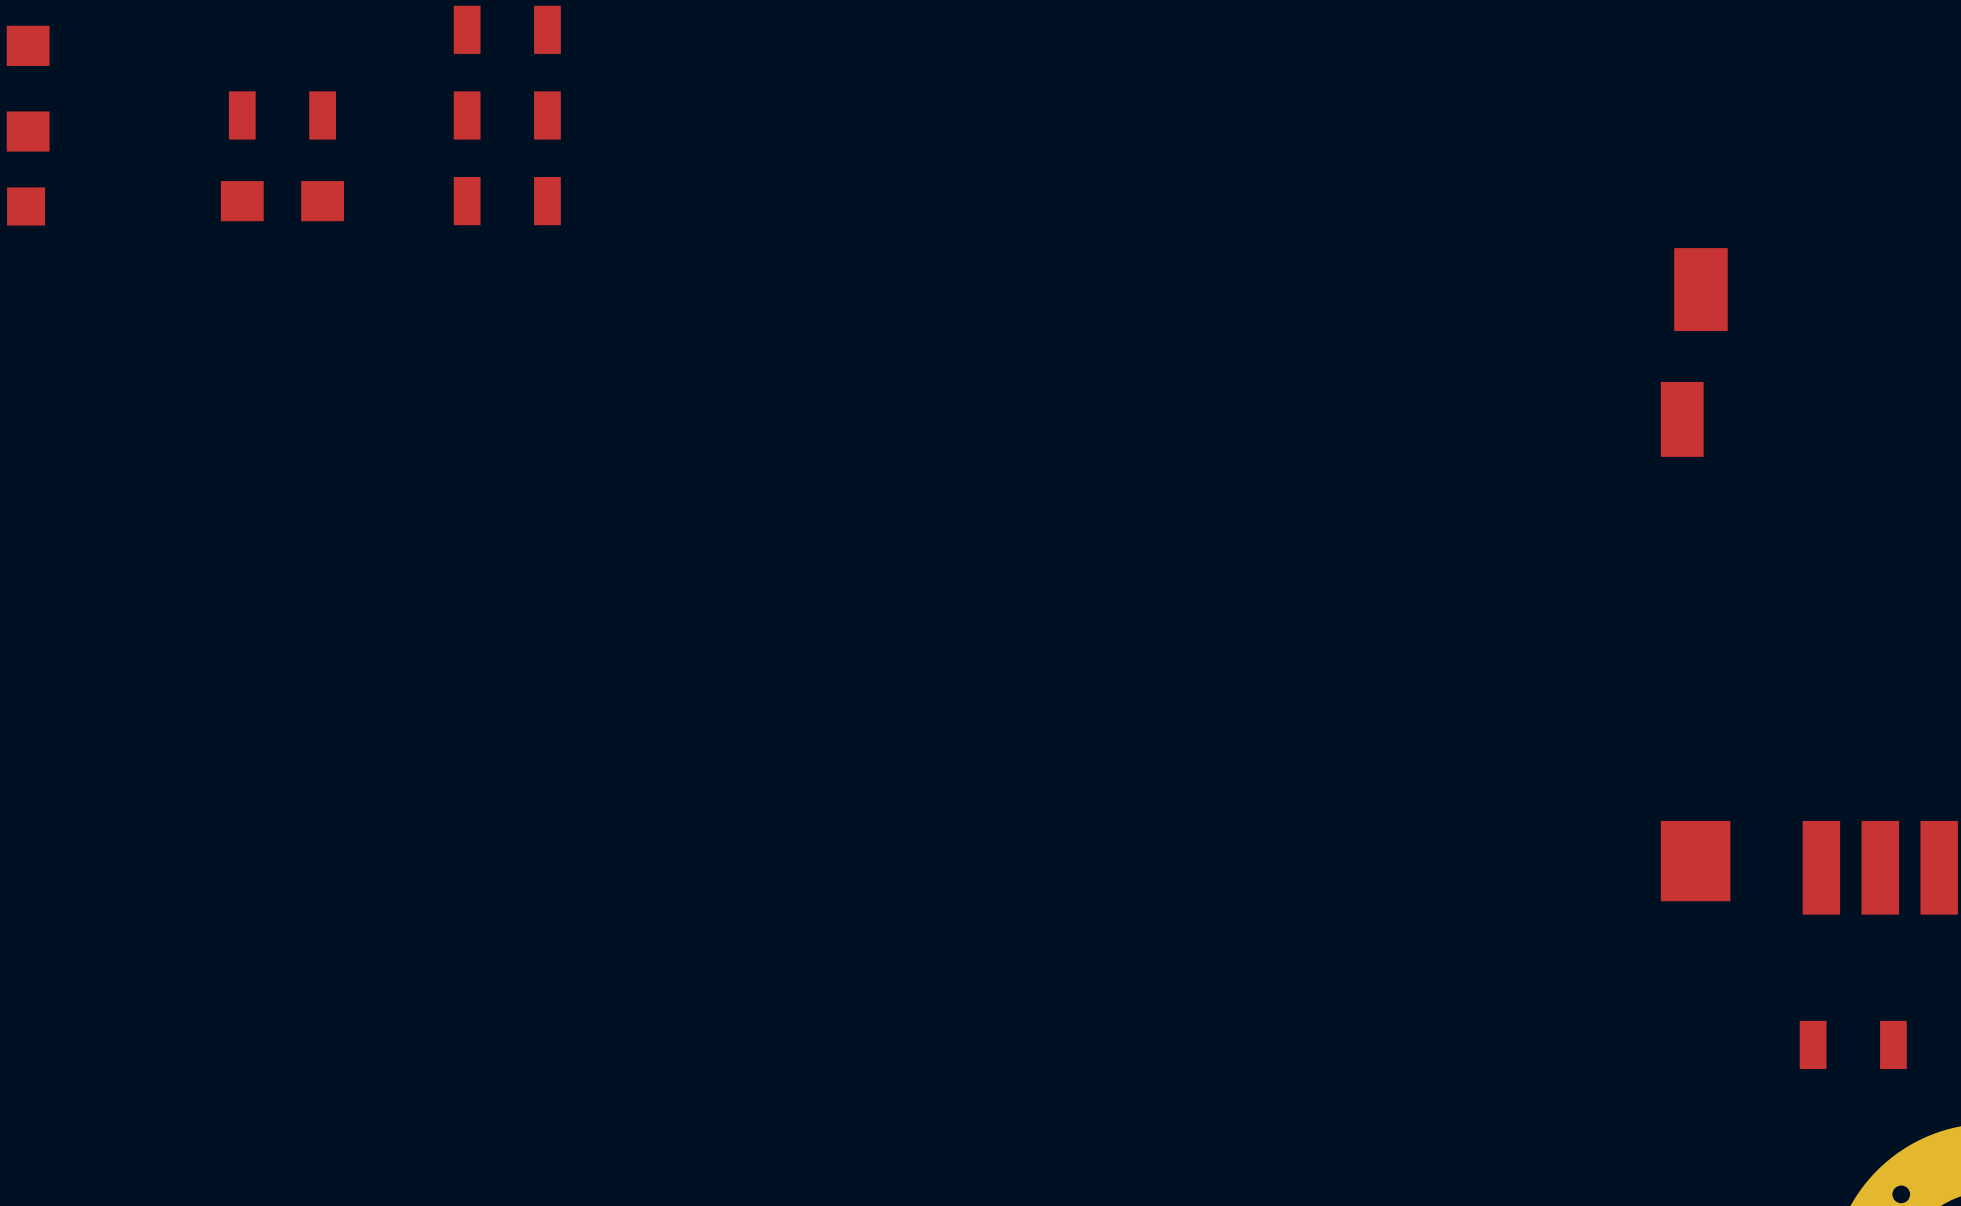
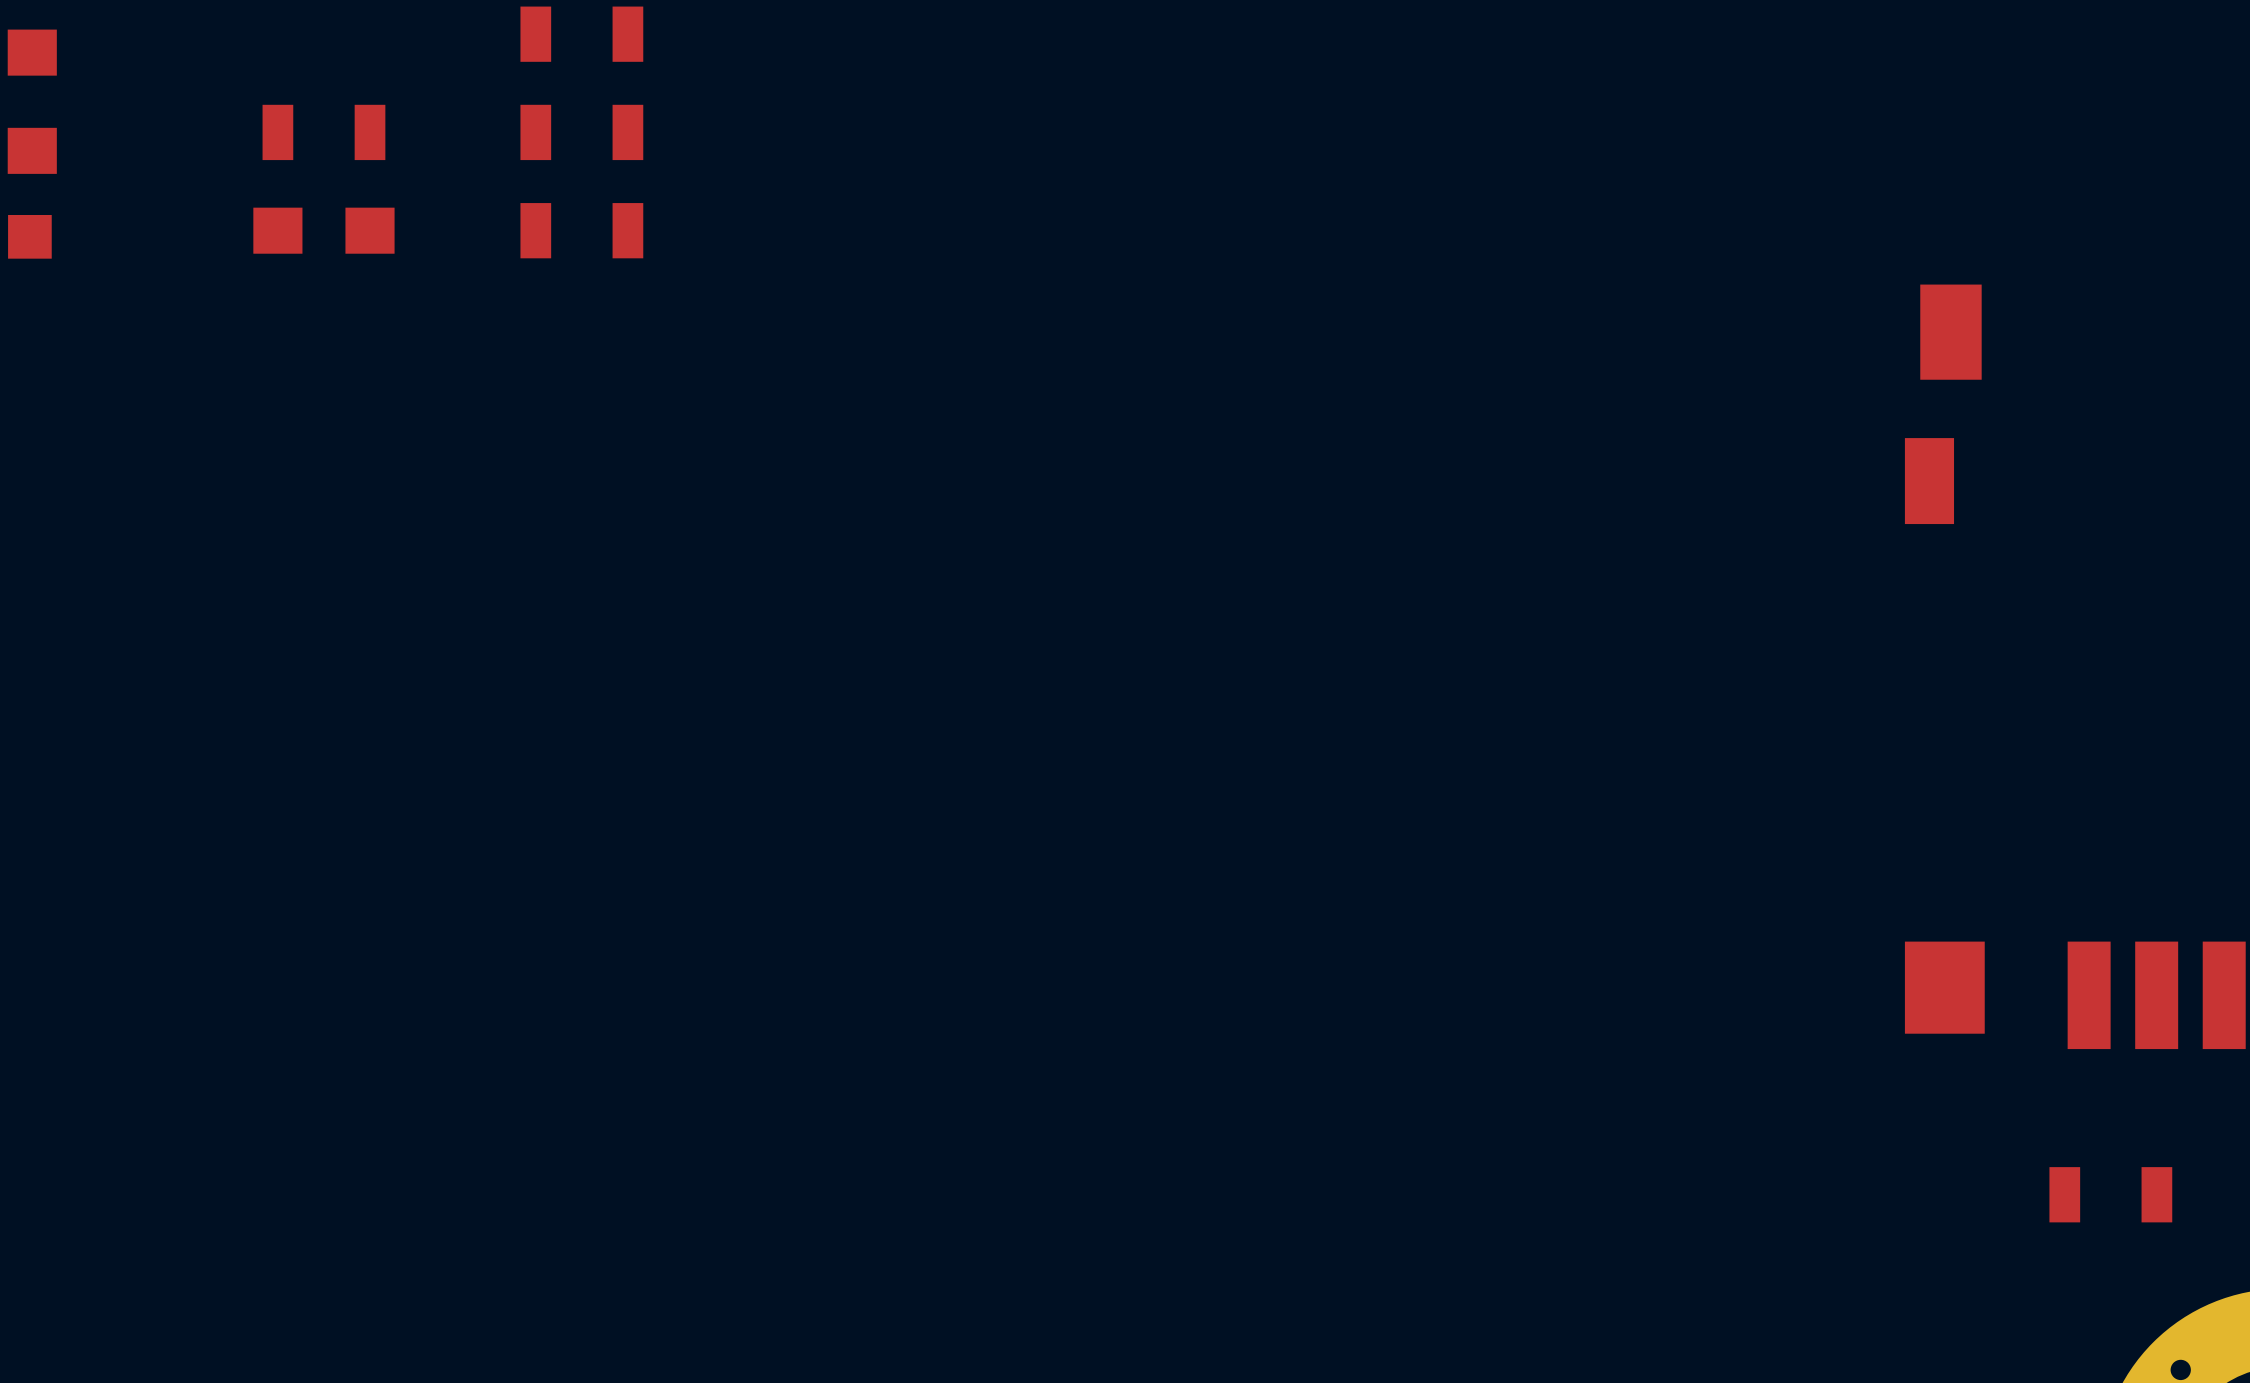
part position: (1853, 1044) -> (2110, 1194)

